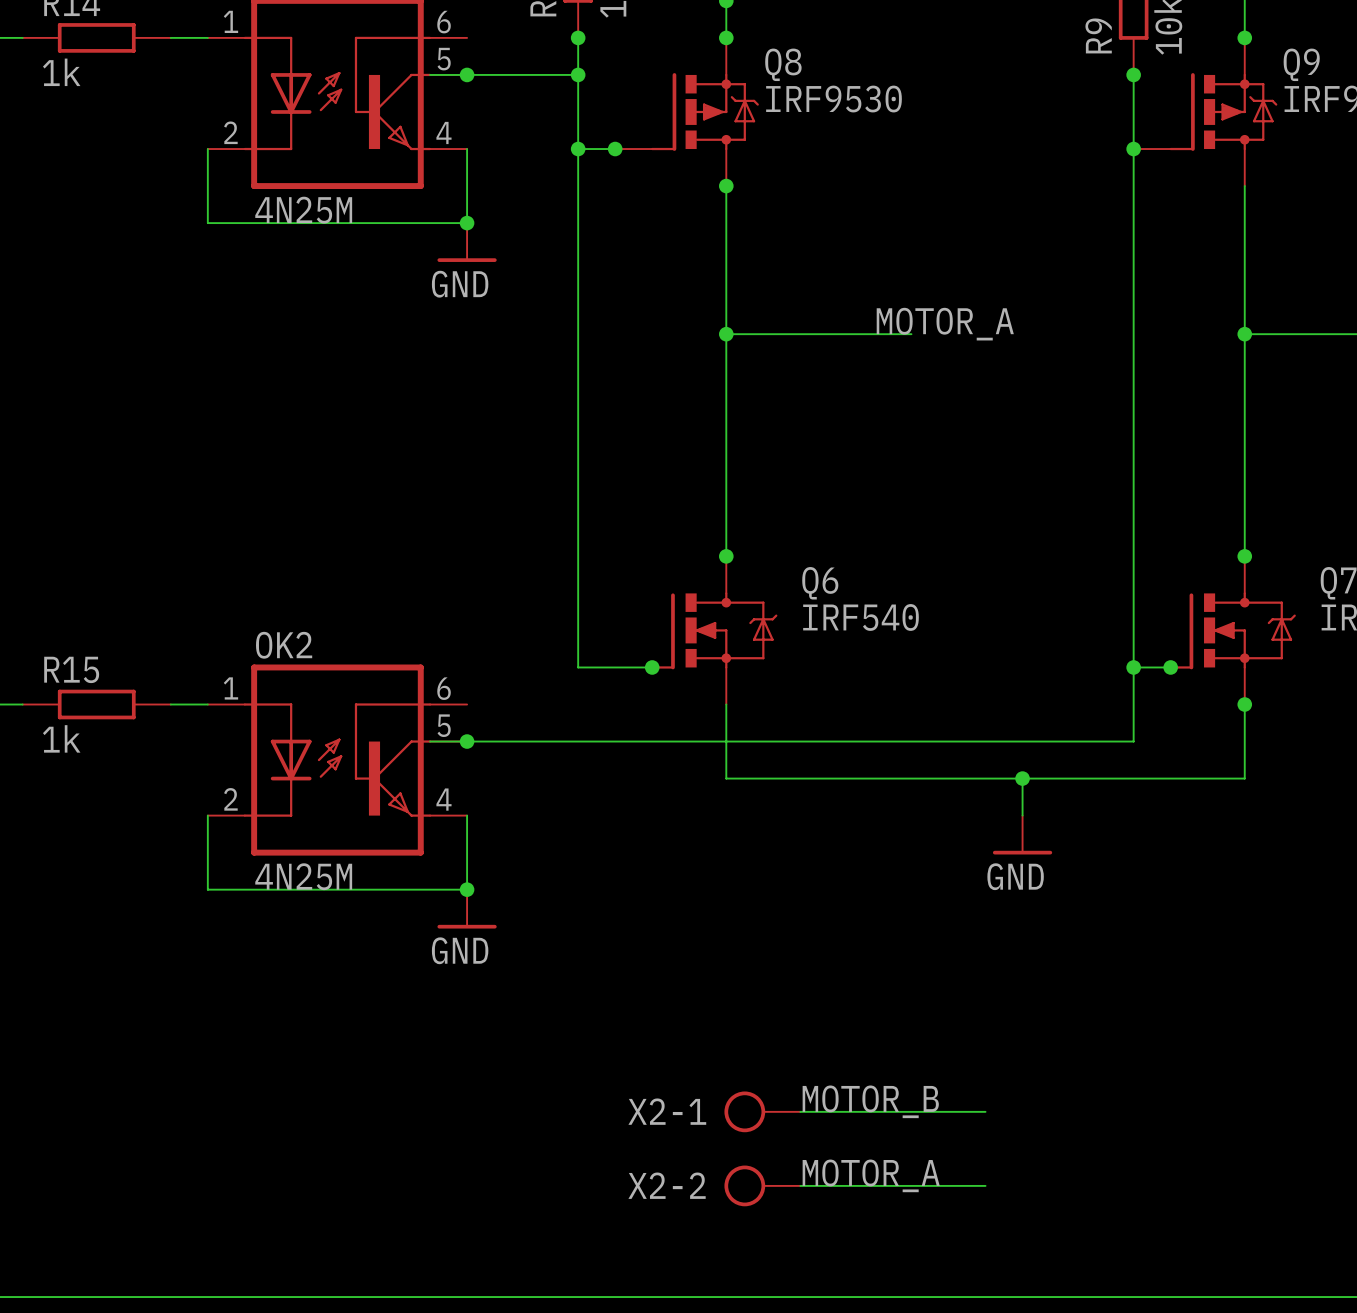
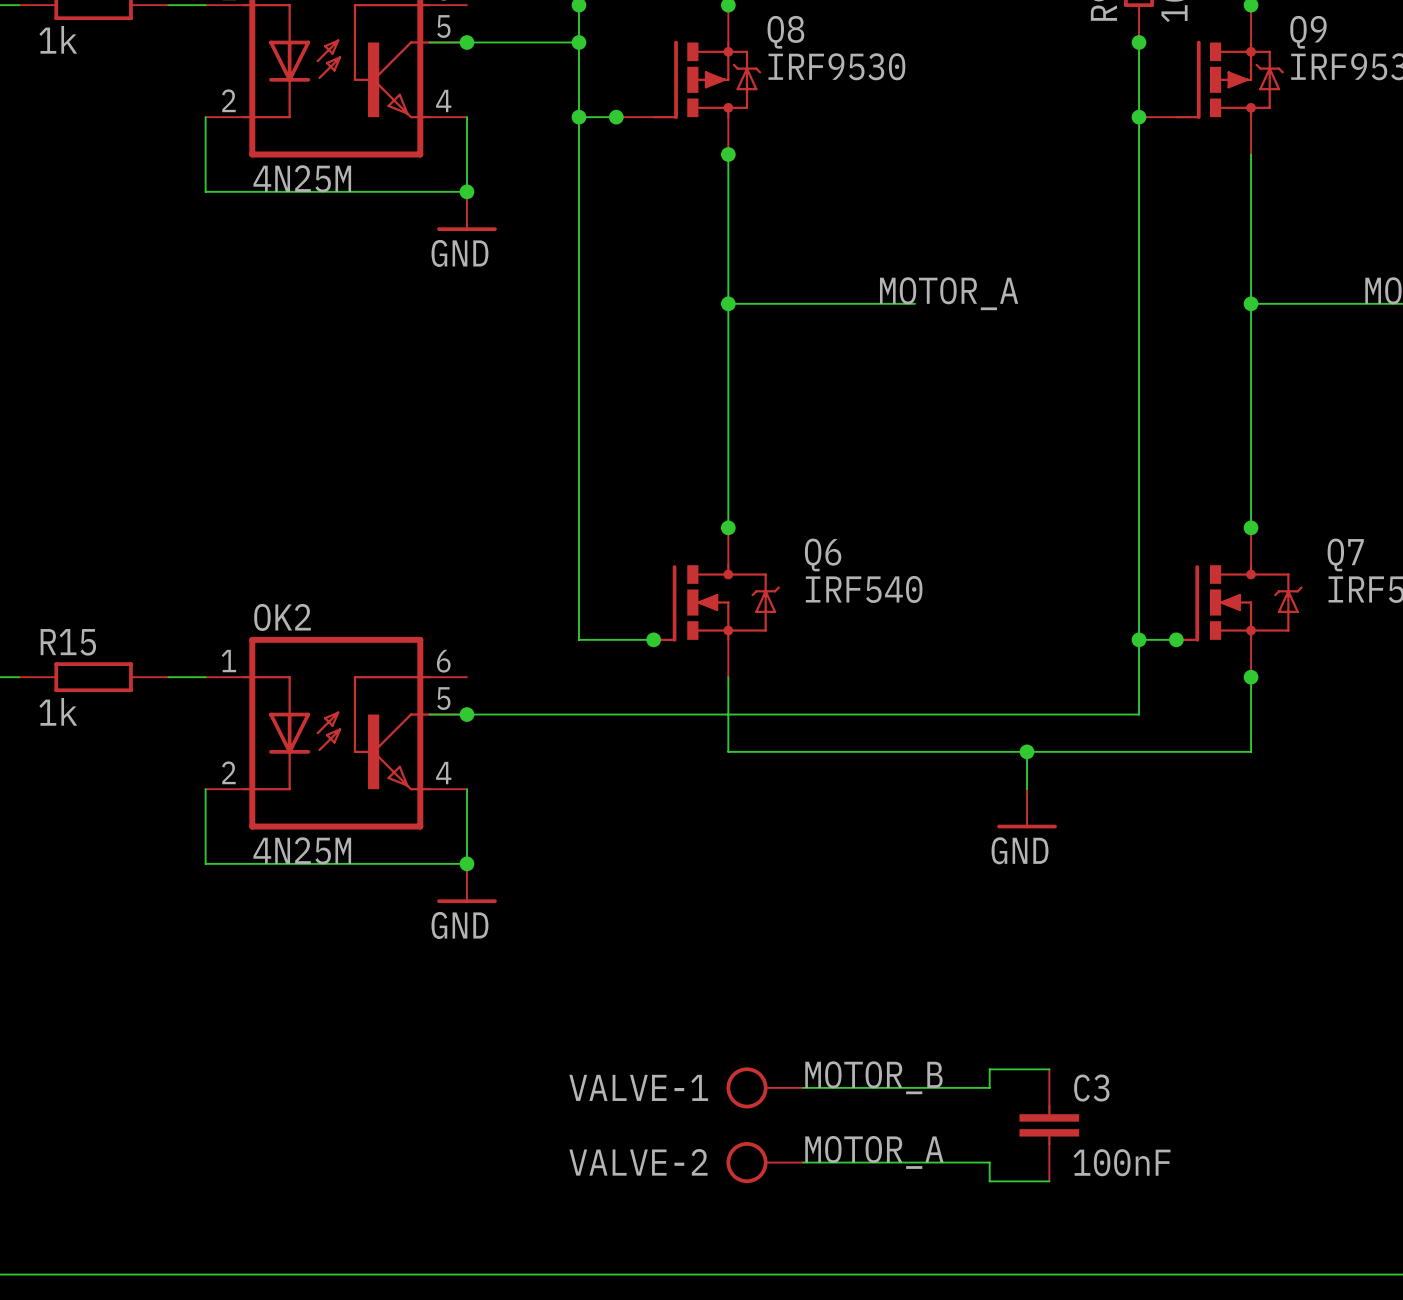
wire: none -> (1049, 1069) (989, 1069) (989, 1087)
X2-1 name: X2-1 (667, 1111) -> VALVE-1 (638, 1087)
C3: none -> 100nF (1049, 1125)
X2-2 name: X2-2 (667, 1185) -> VALVE-2 (638, 1162)
wire: none -> (989, 1162) (989, 1181) (1049, 1181)

